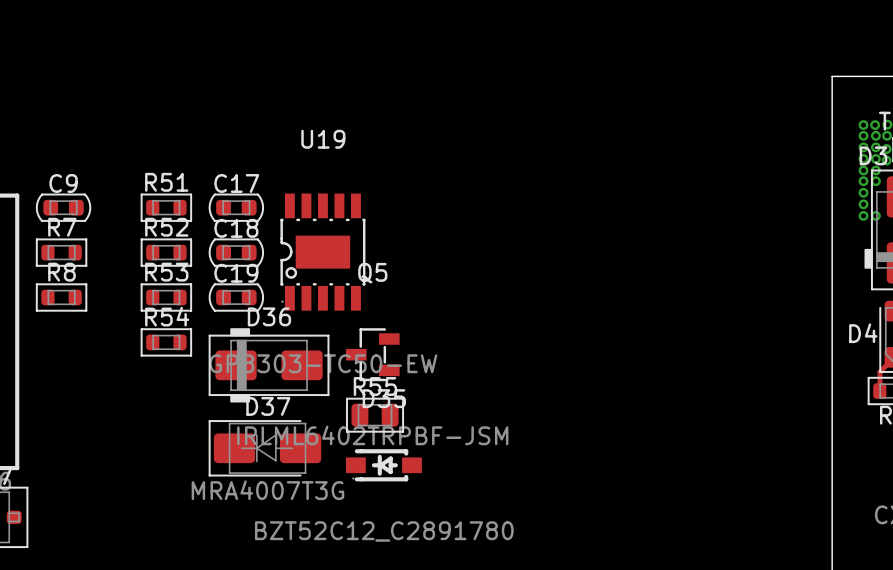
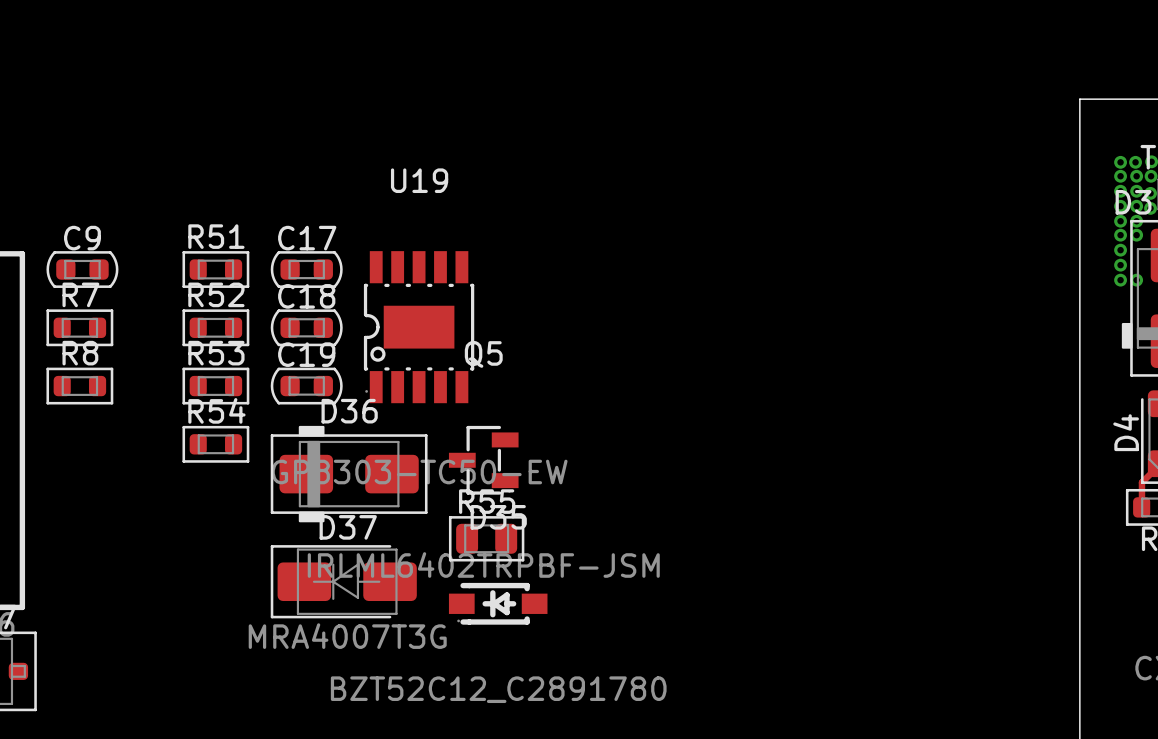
D4 name rotation: 0° (863, 333) -> 90° counterclockwise (1126, 432)

